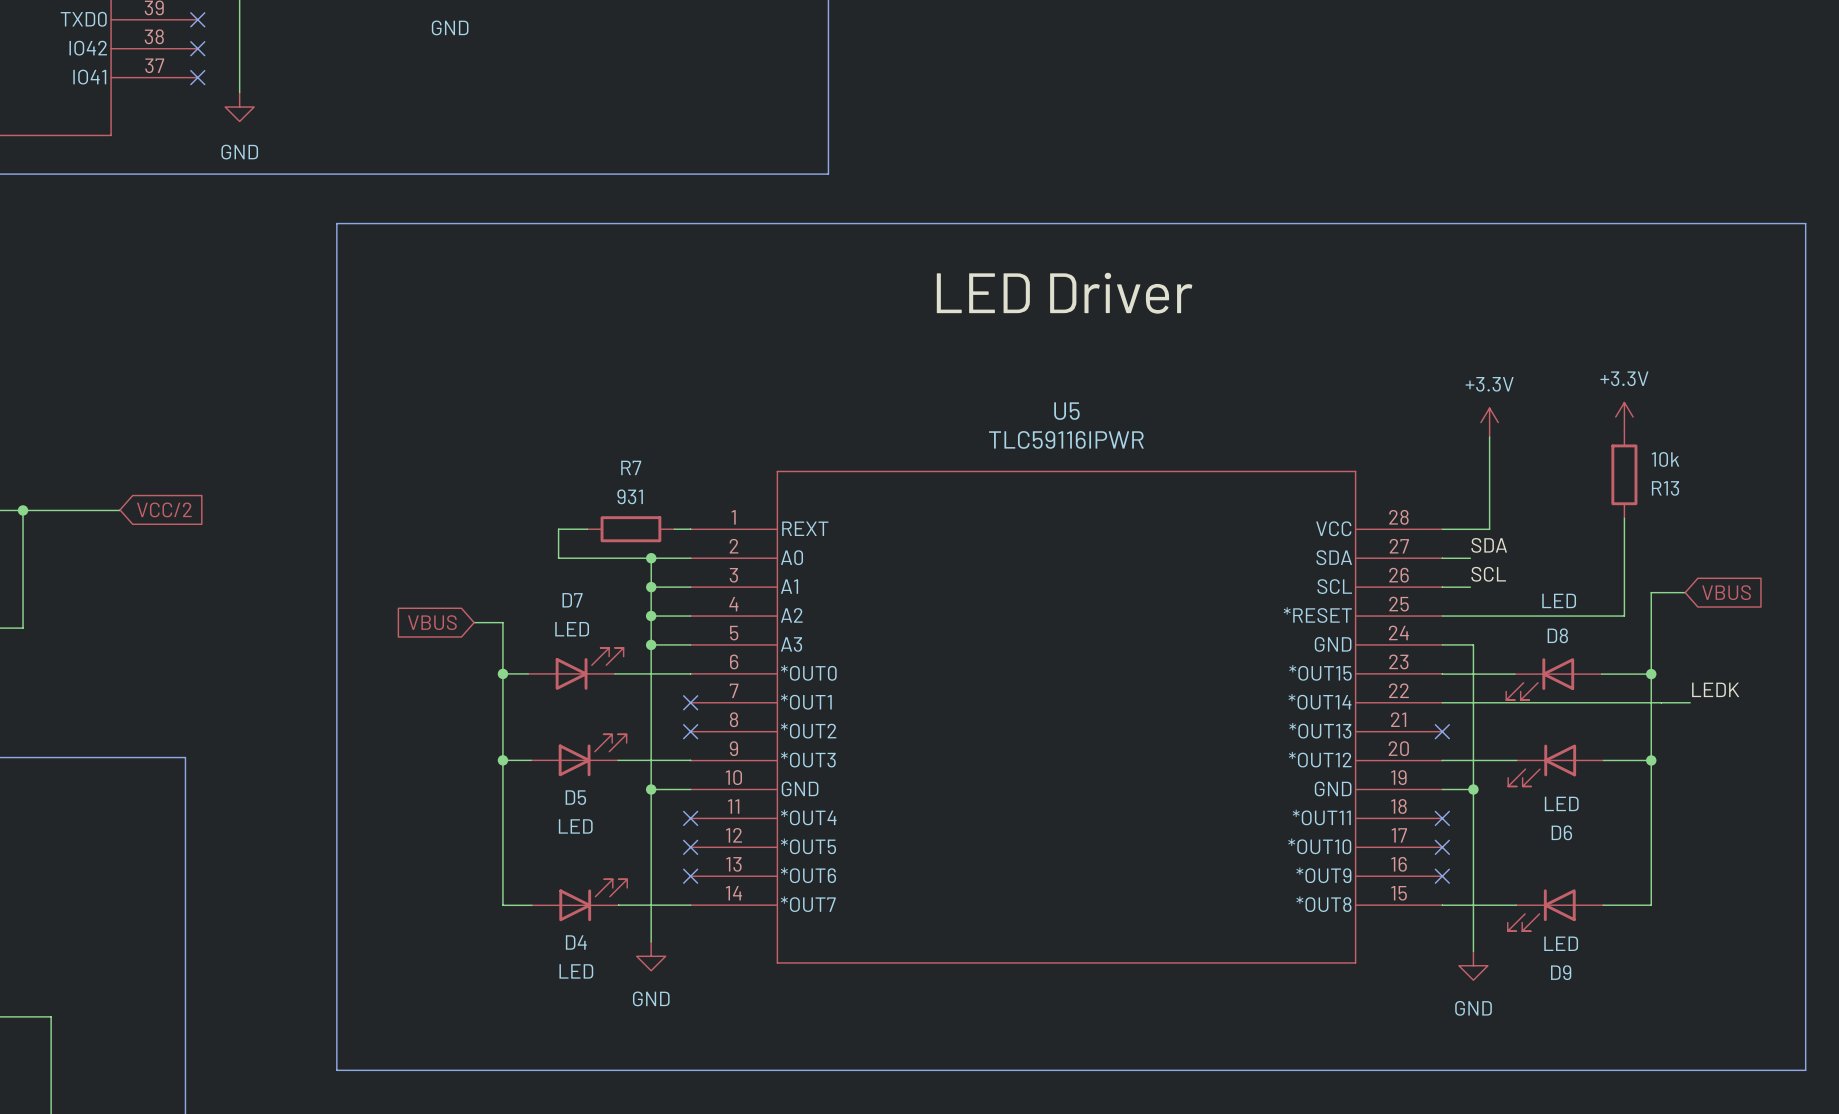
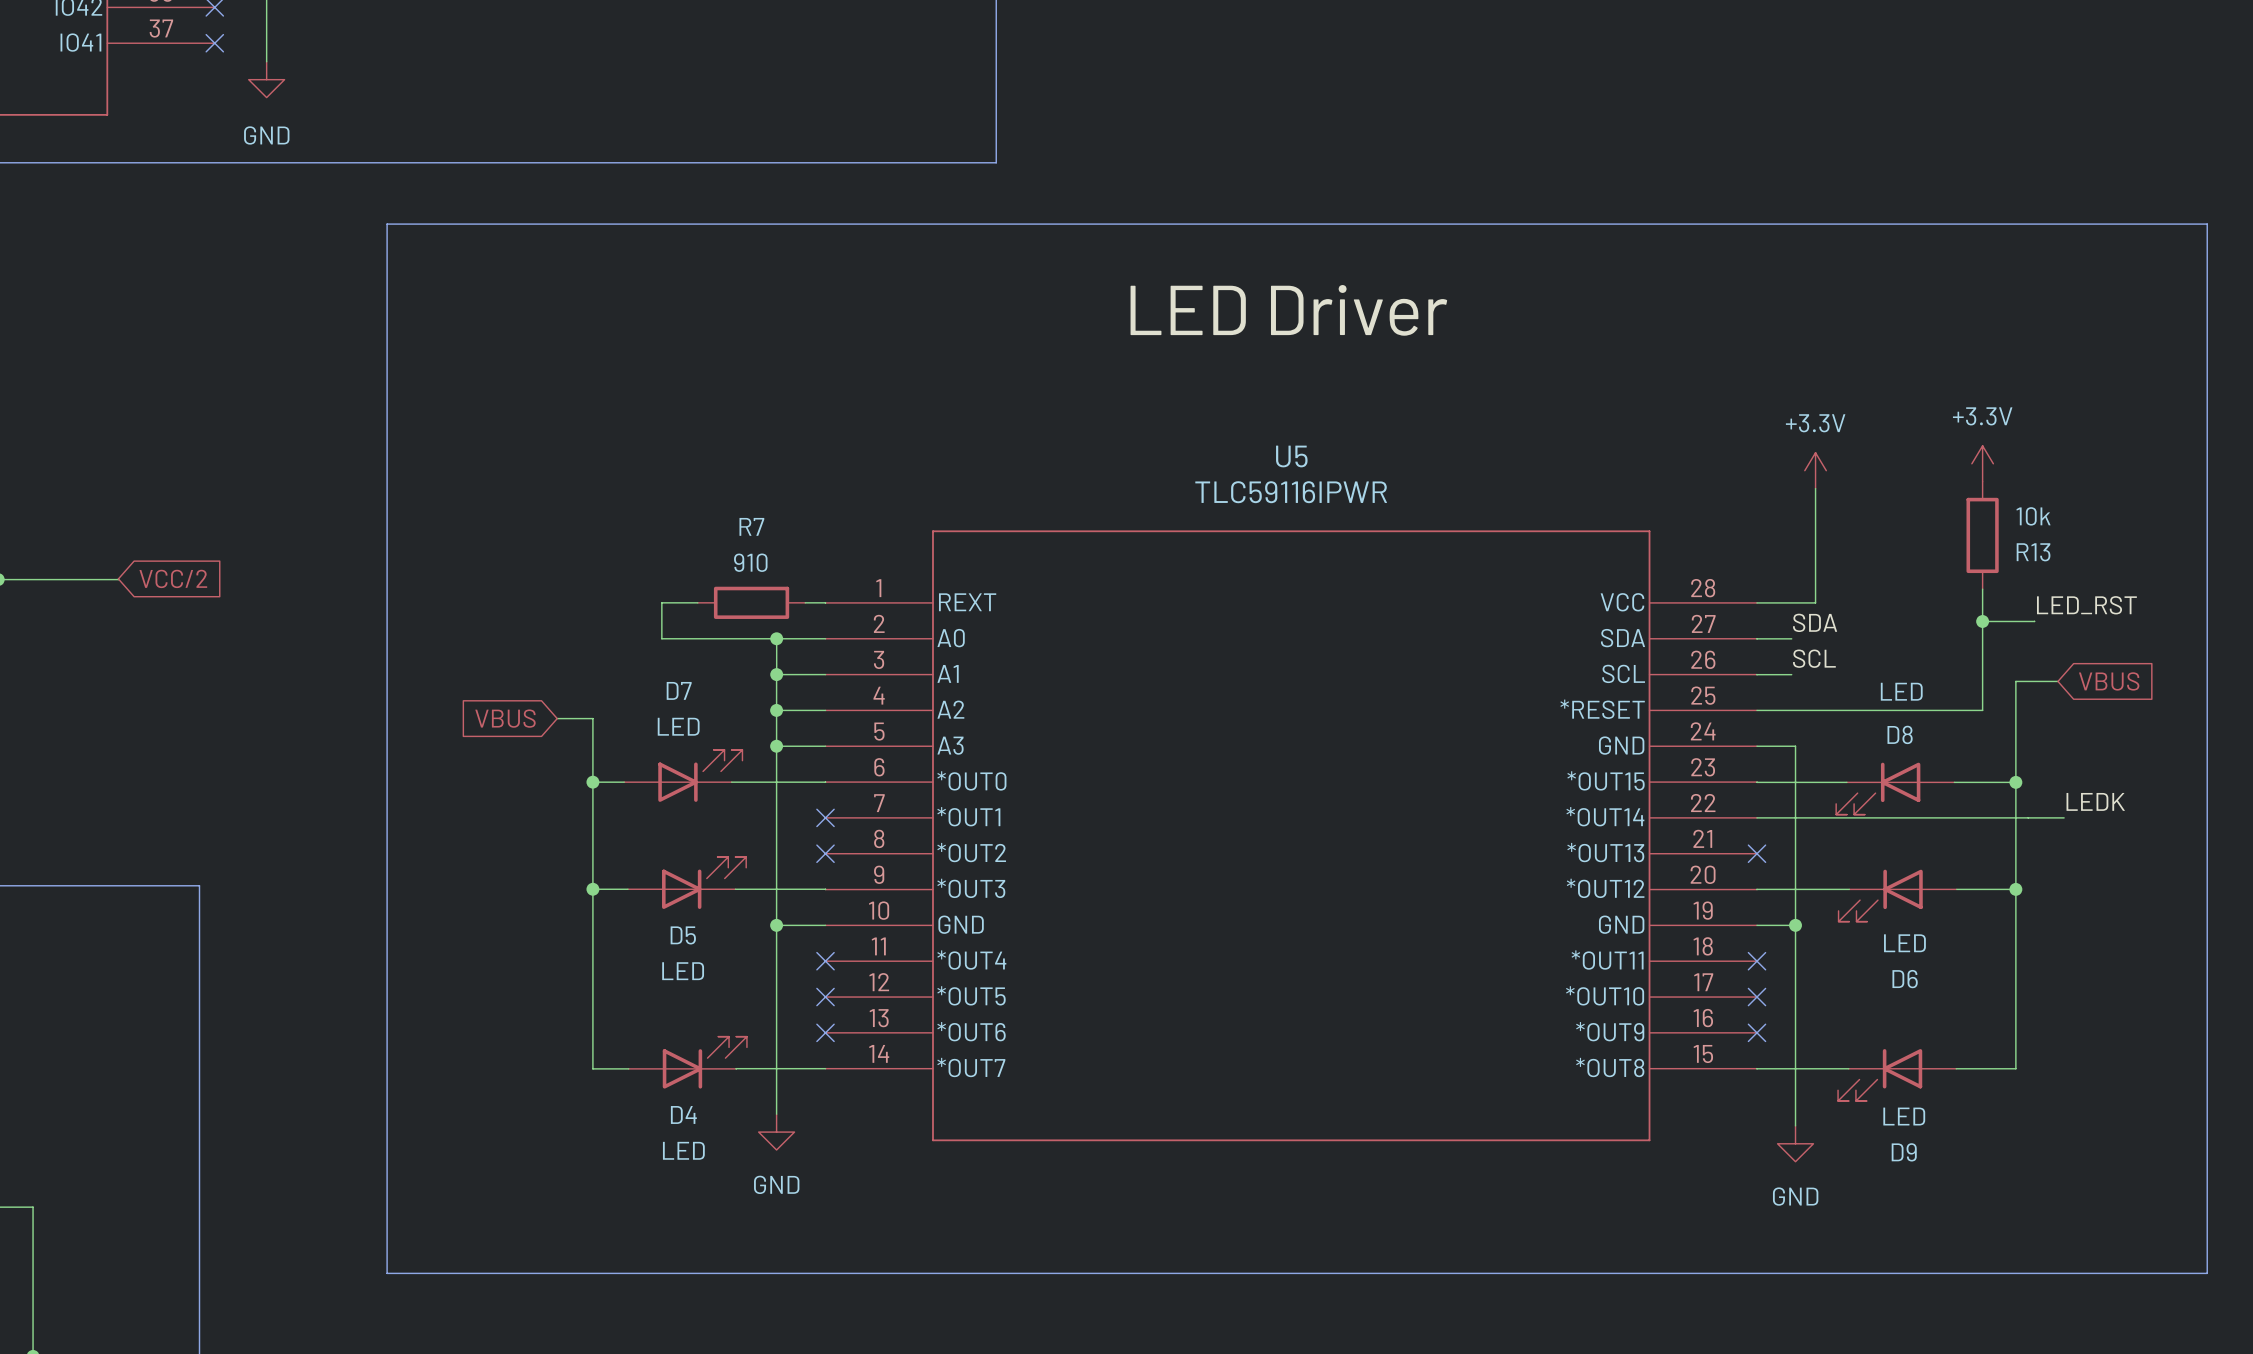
R7 value: 931 (630, 496) -> 910 (750, 562)
label: none -> LED_RST (2086, 605)
wire: none -> (1982, 621) (2034, 621)
junction: none -> (1982, 621)

